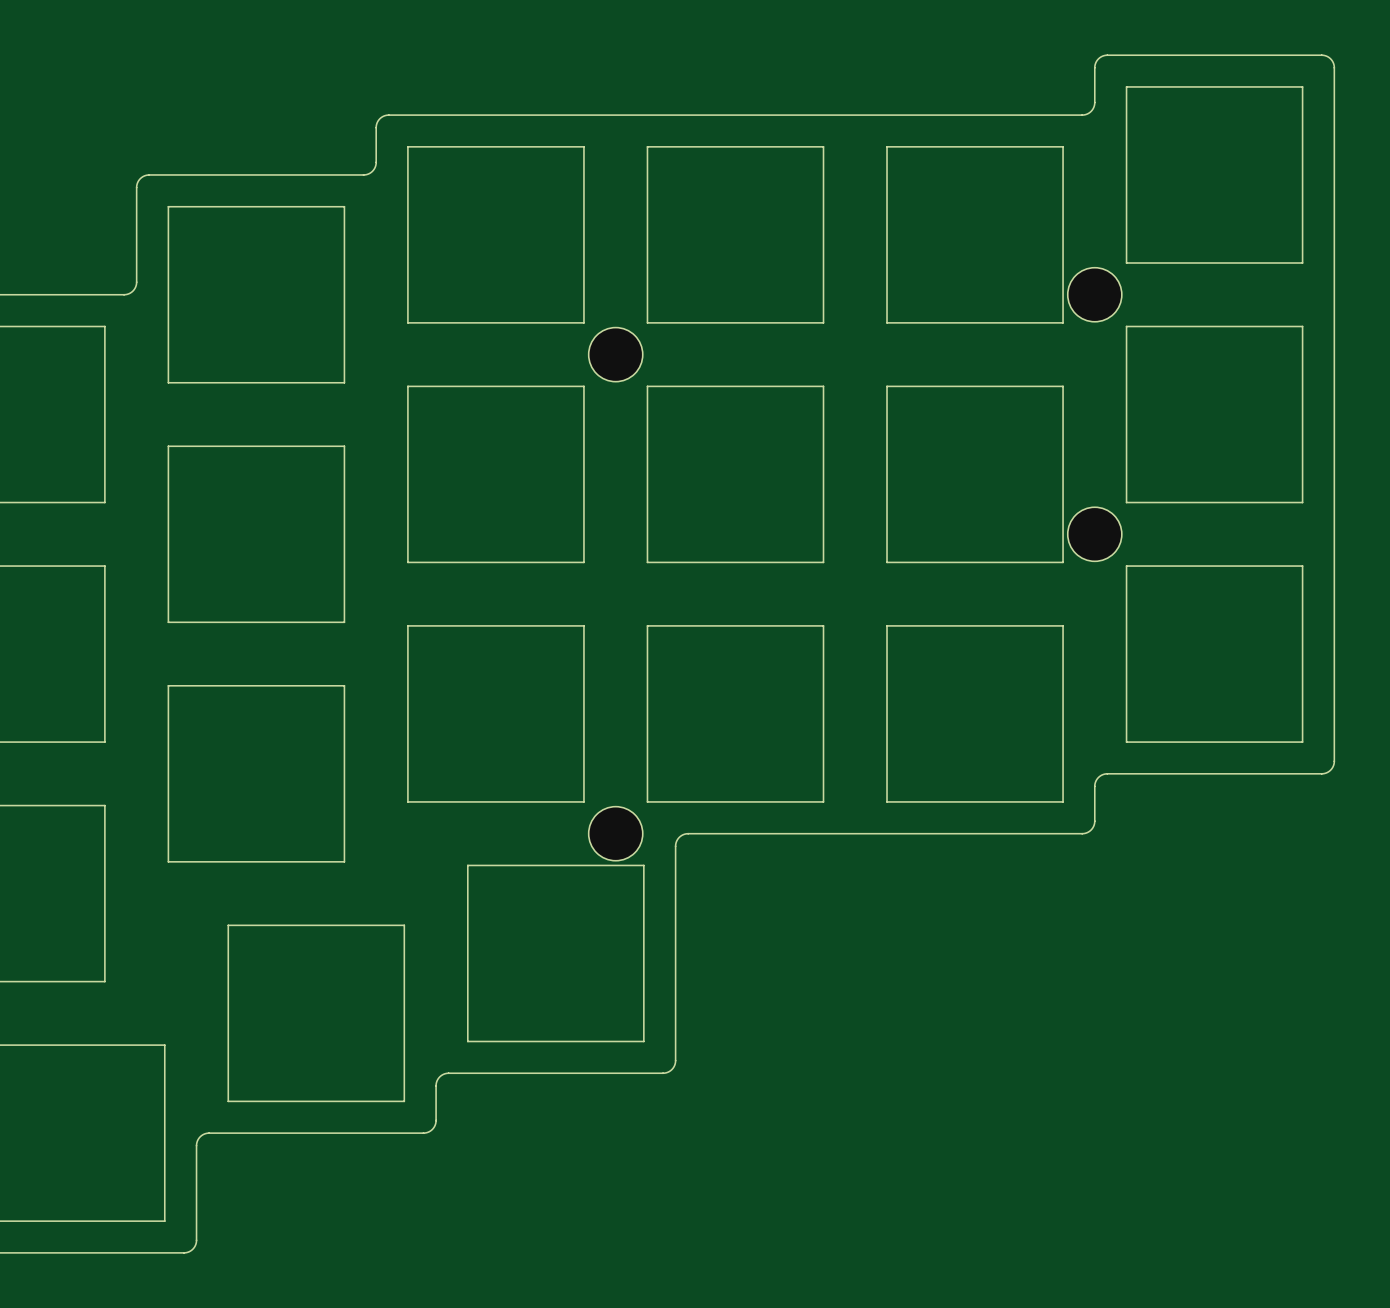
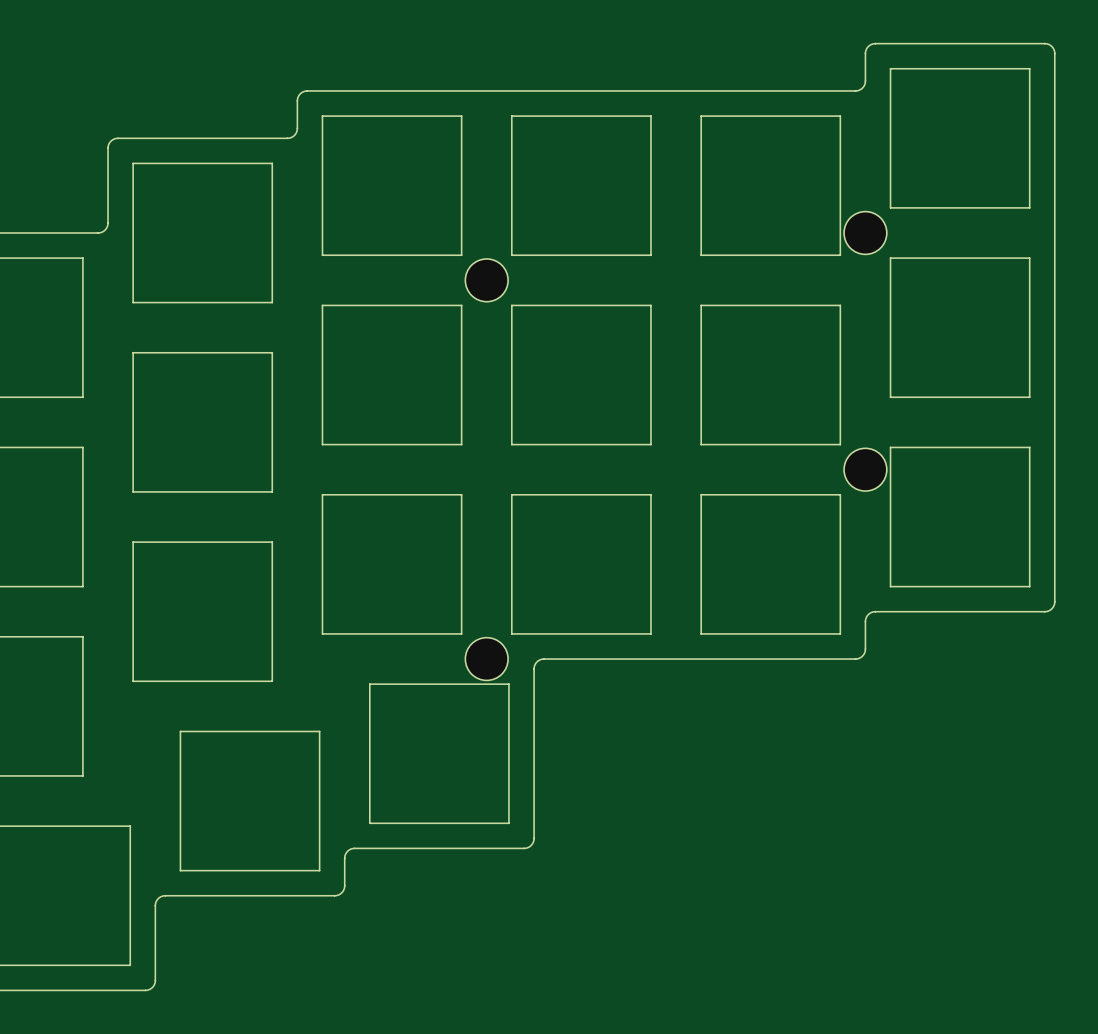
part position: (1094, 534) -> (865, 469)

